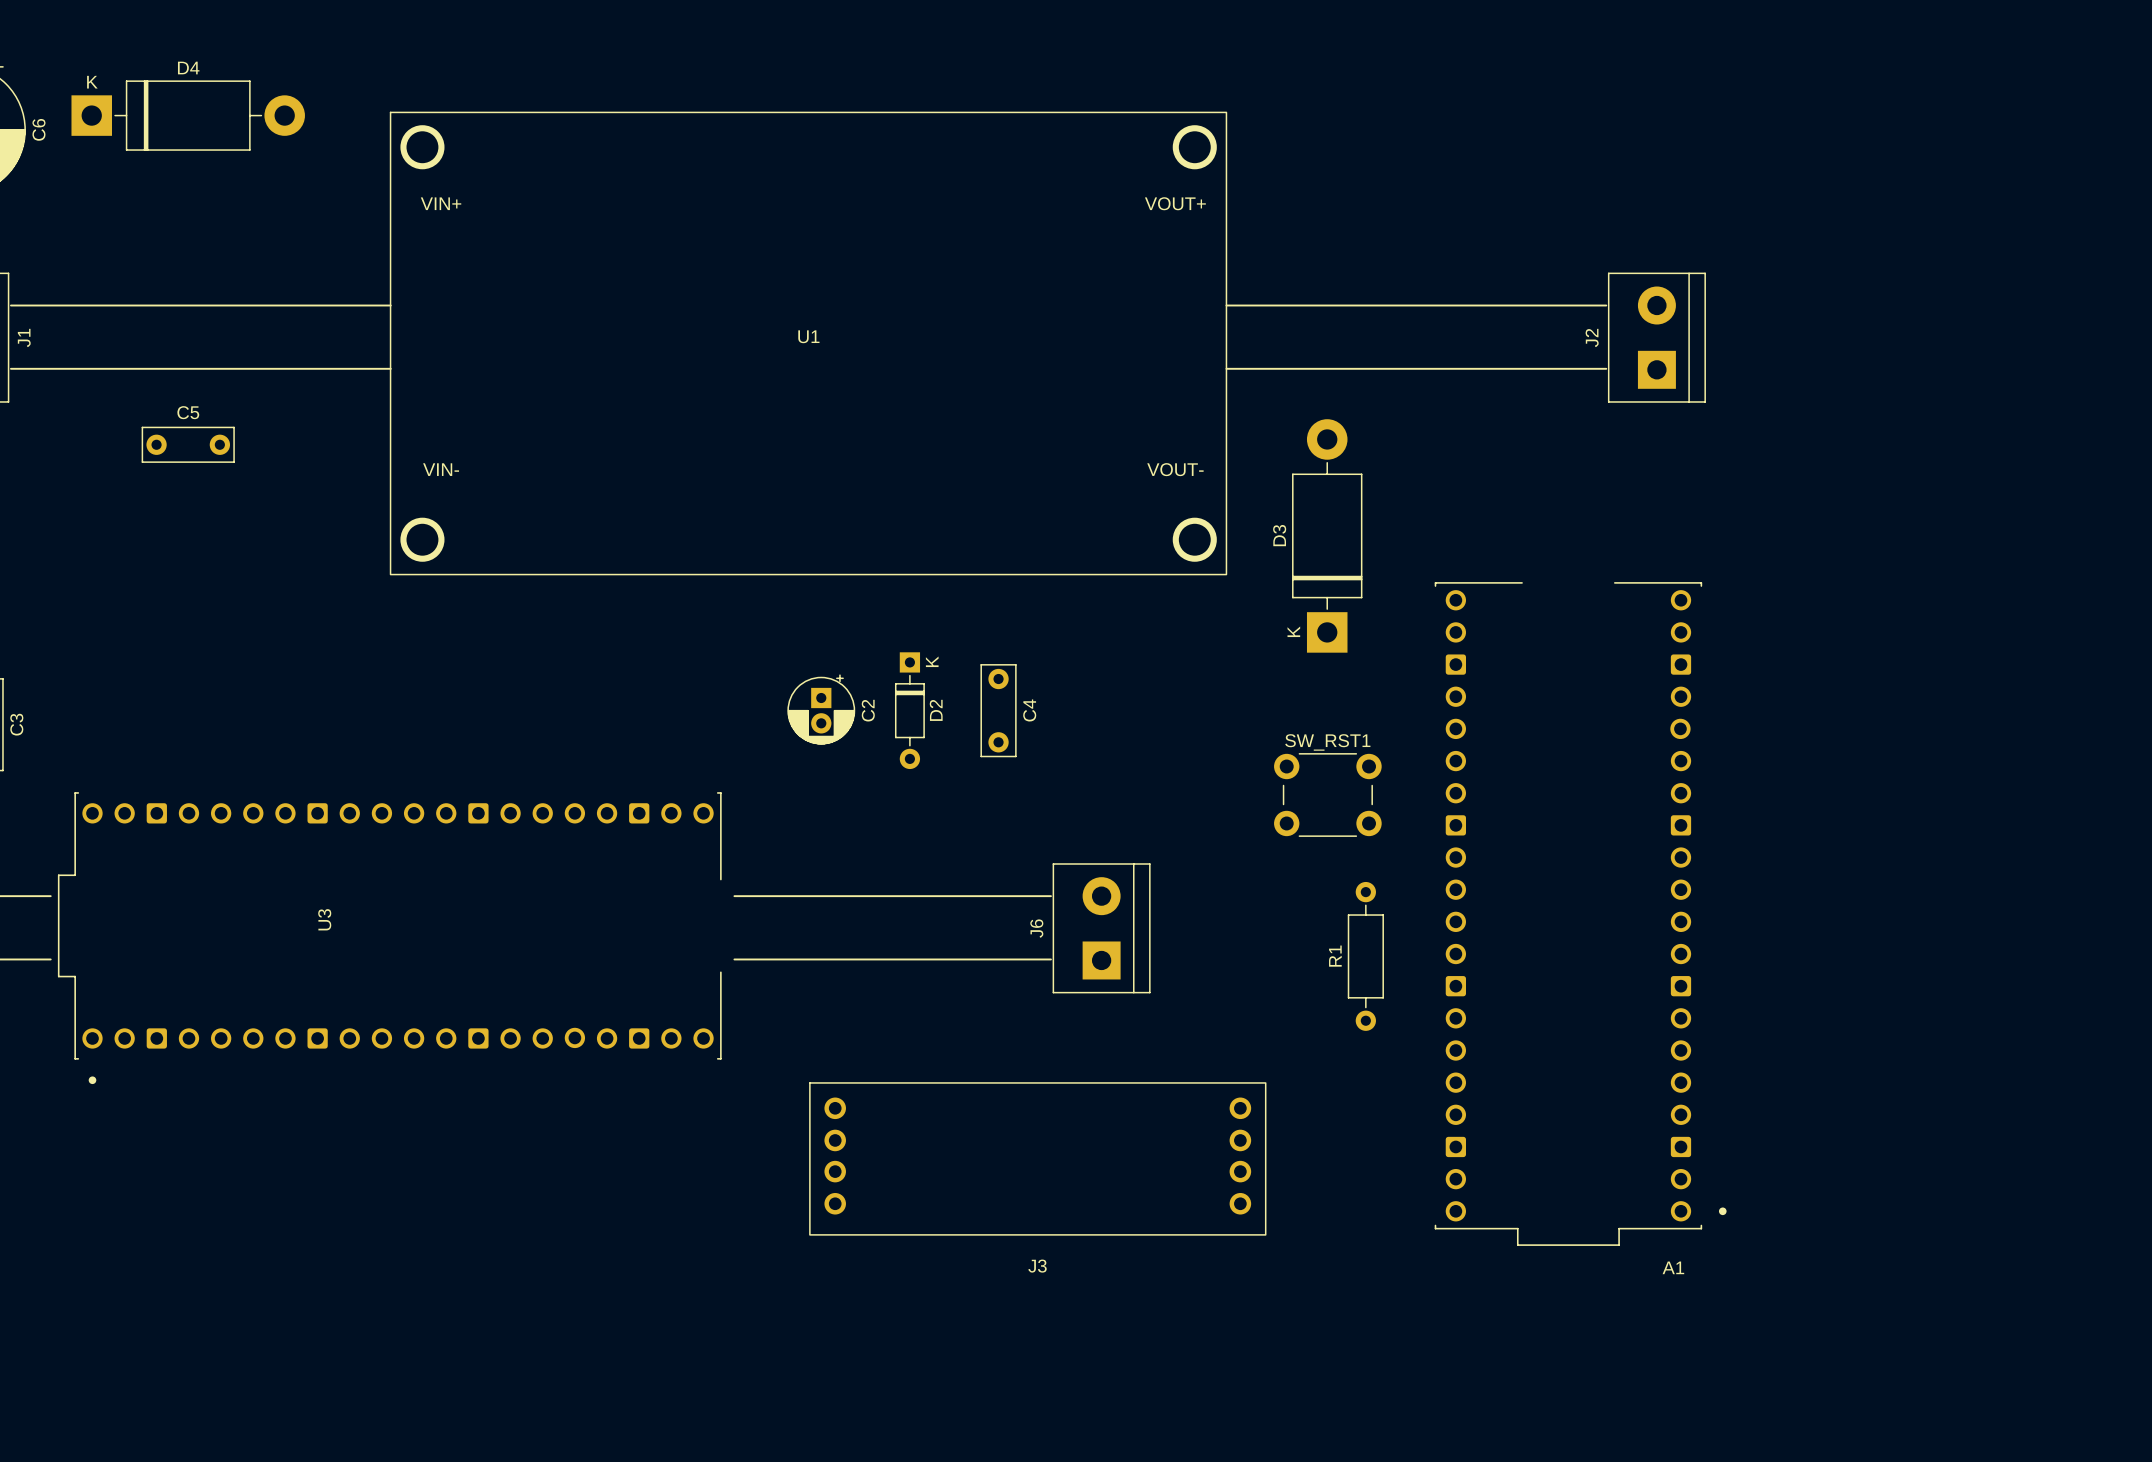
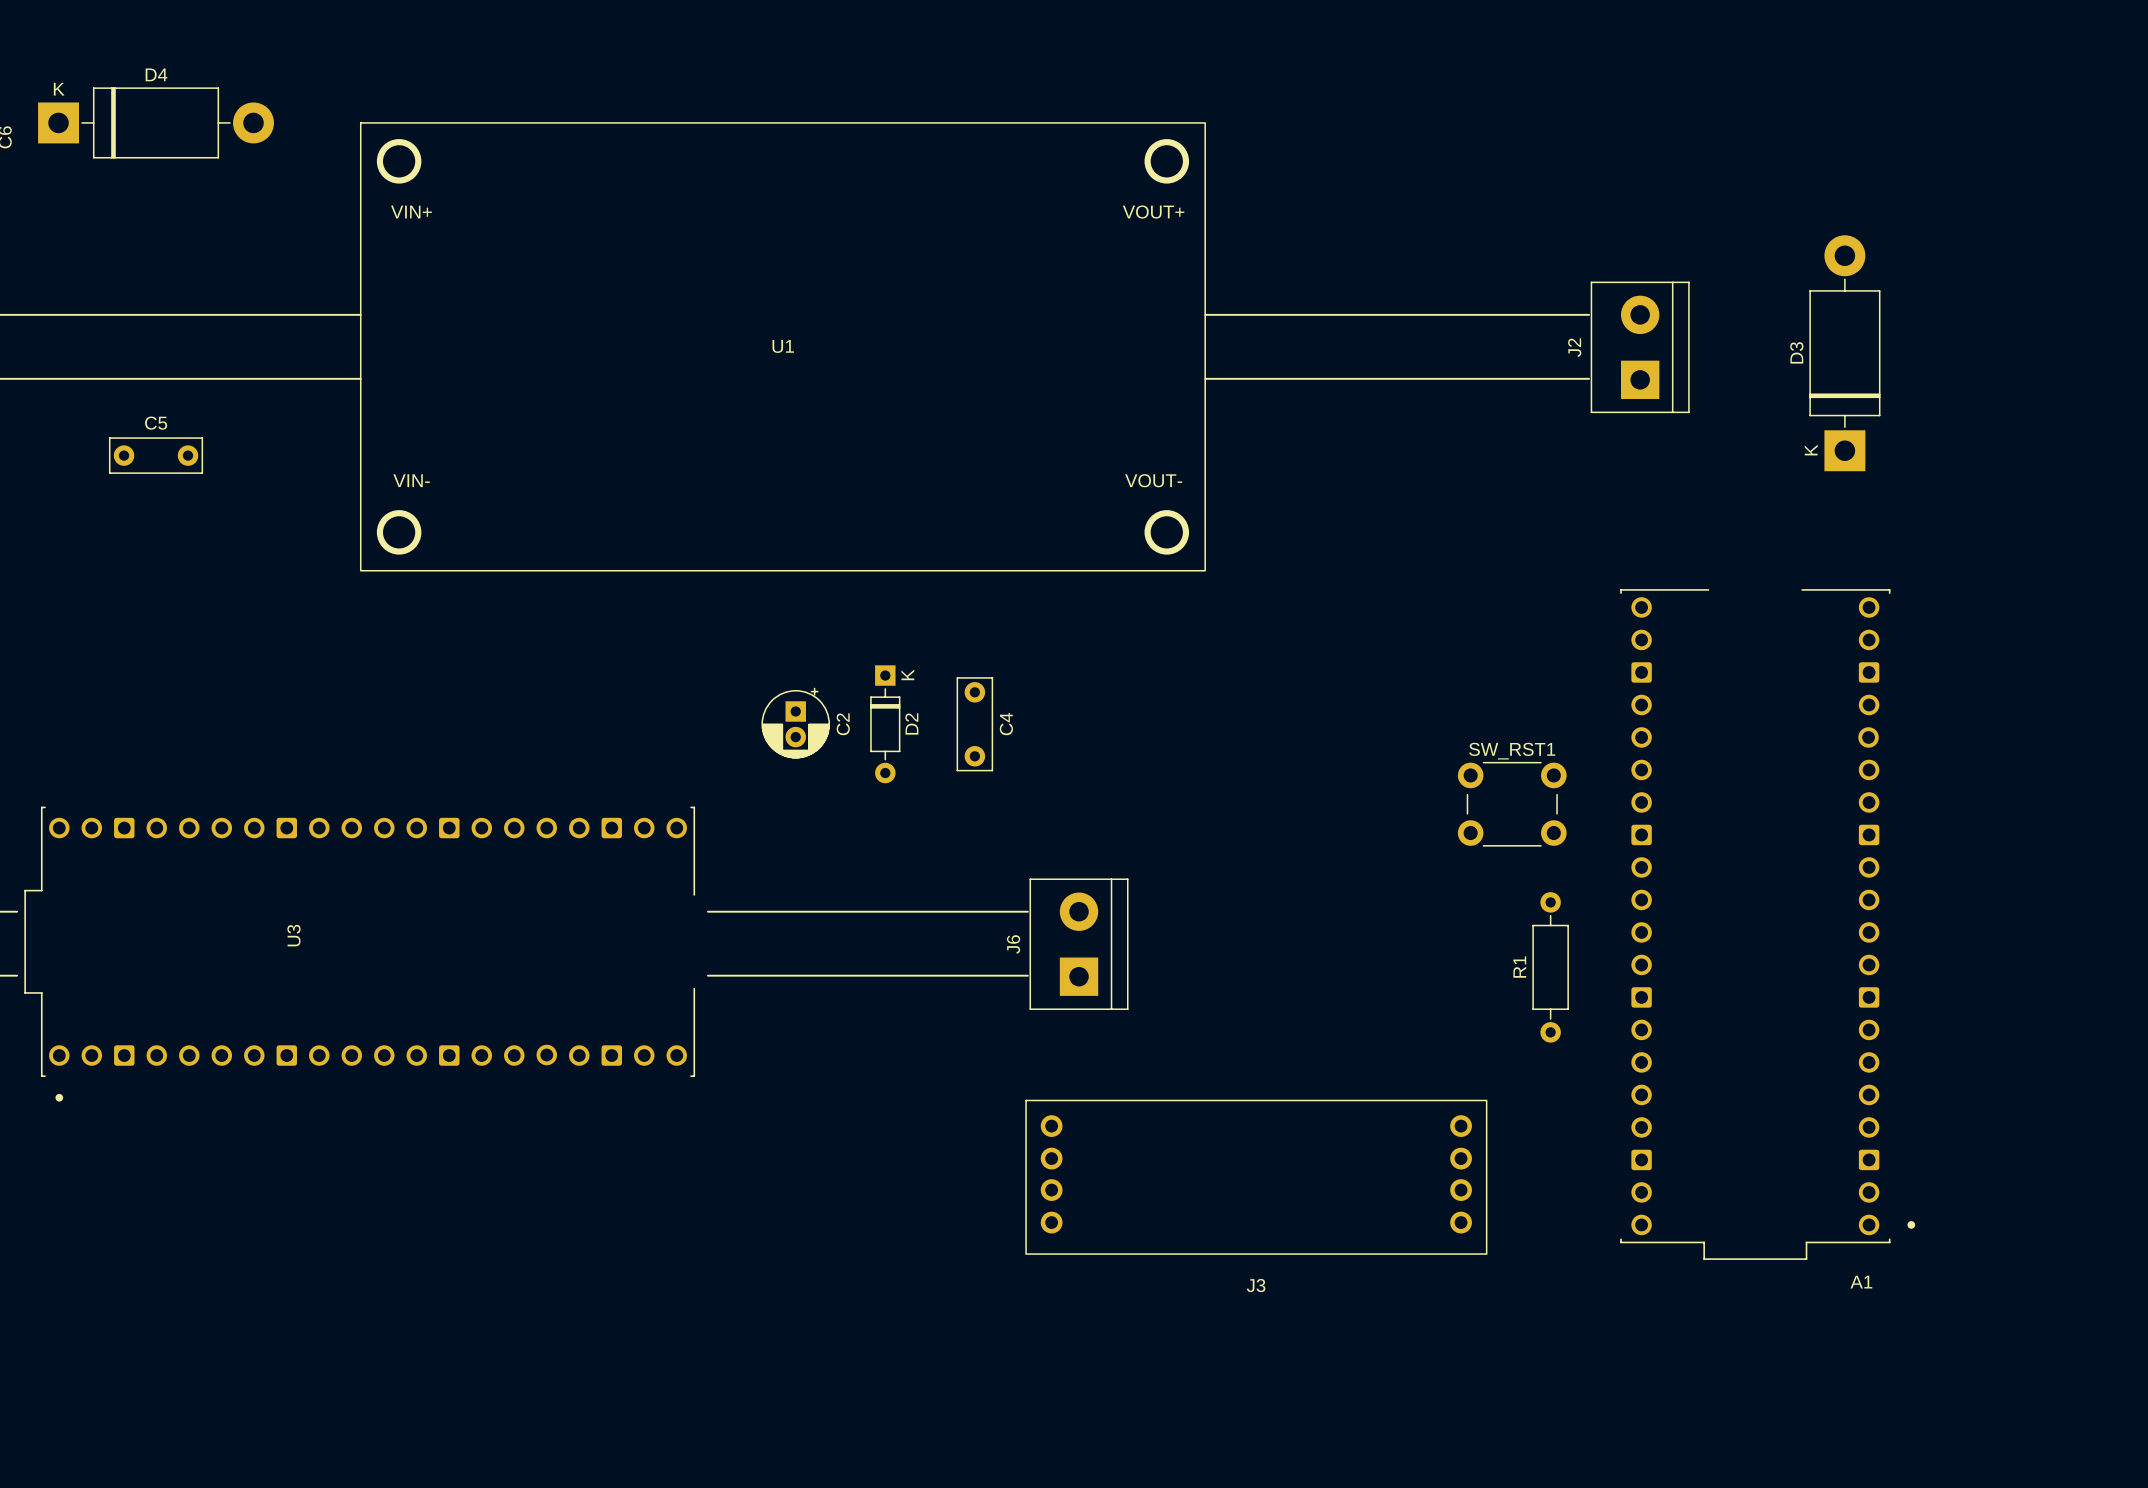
U1 footprint: [389, 111, 1228, 576] -> [359, 122, 1206, 572]
D3 position: (1327, 535) -> (1844, 353)
SW_RST1 position: (1327, 794) -> (1512, 804)
A1 position: (1580, 914) -> (1767, 924)
R1 position: (1365, 956) -> (1550, 967)
J3 position: (1037, 1158) -> (1256, 1177)

